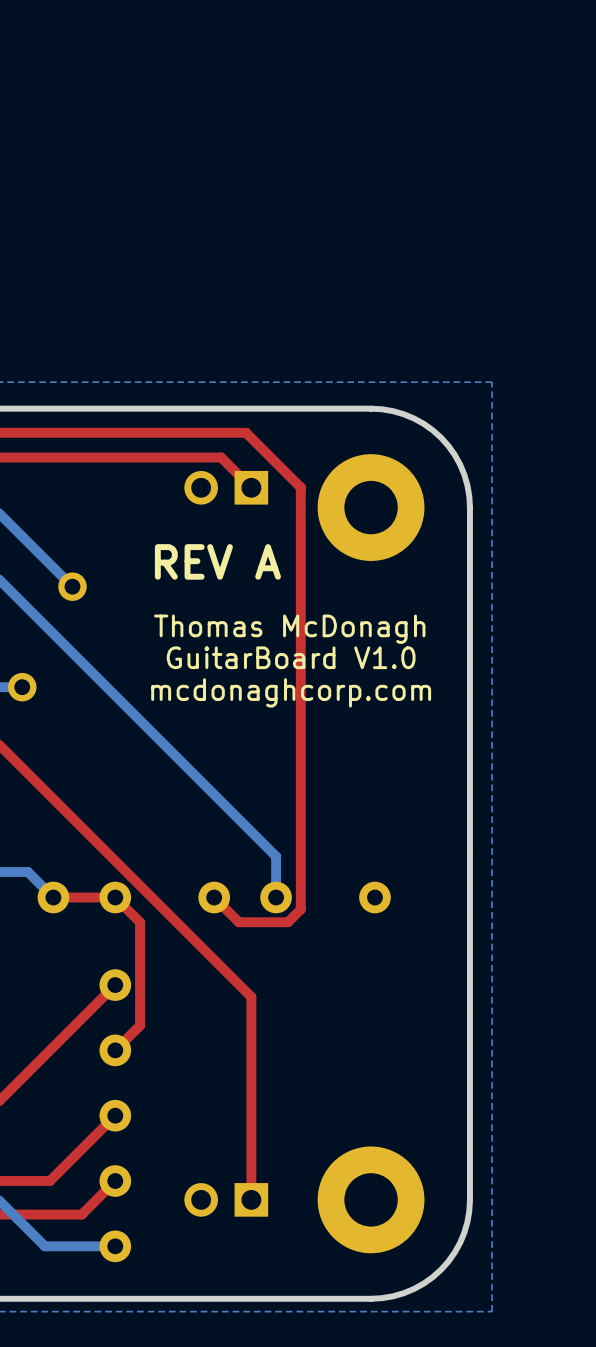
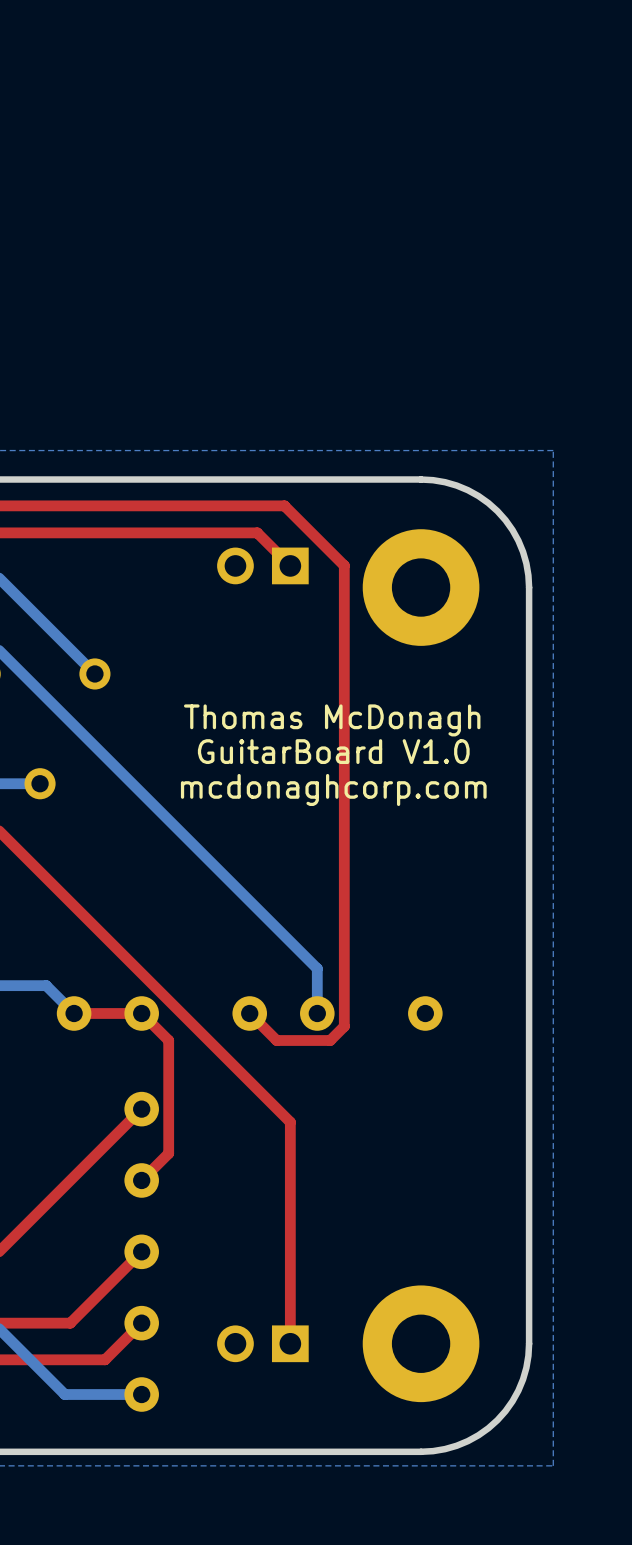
text: REV A (217, 561) -> none

